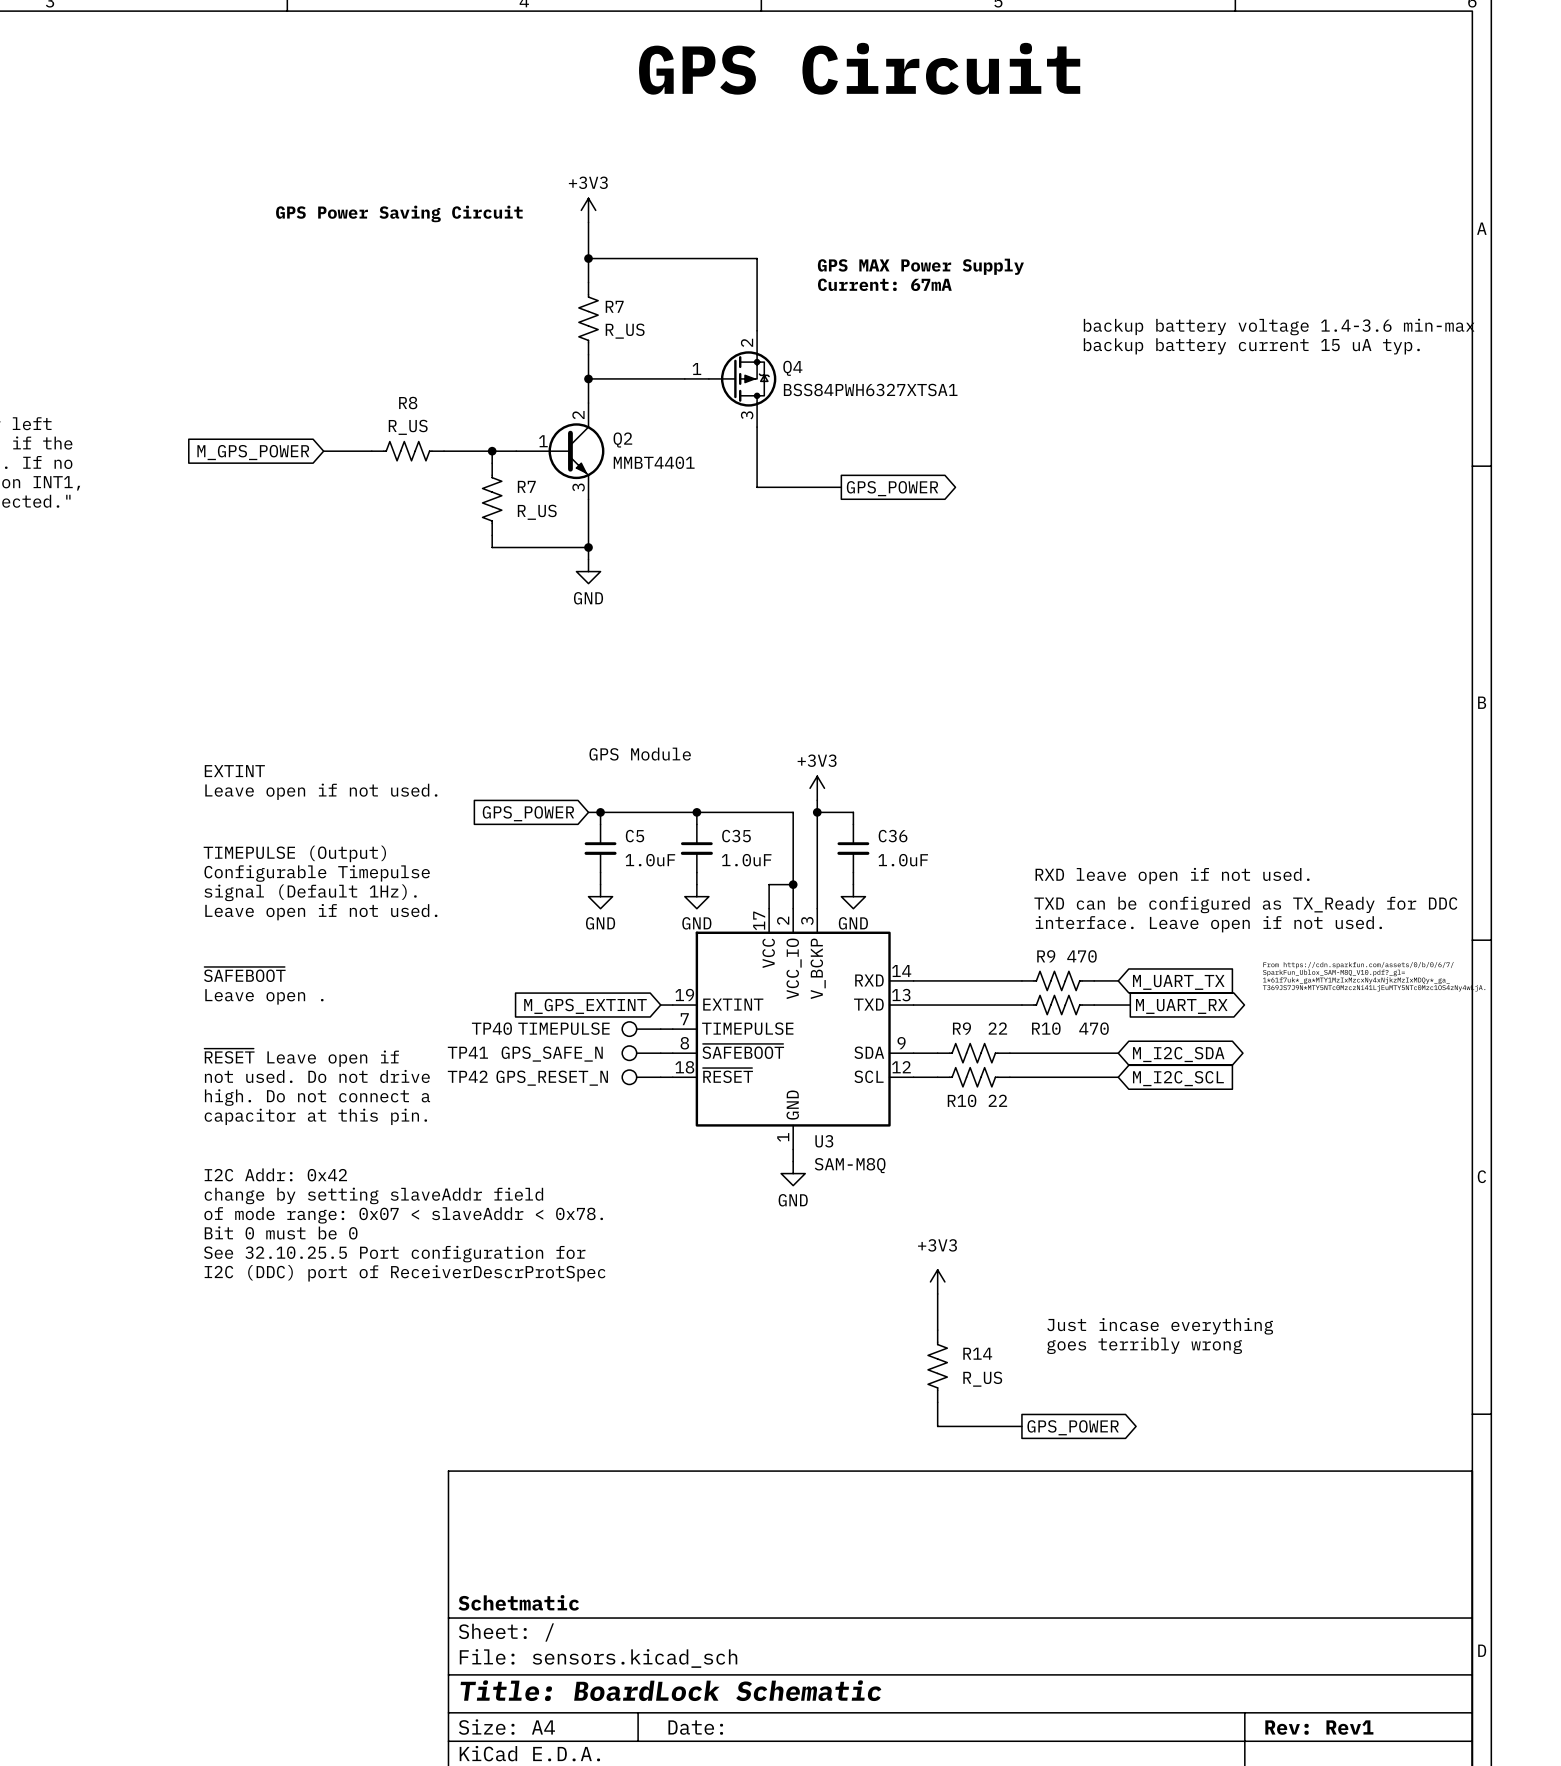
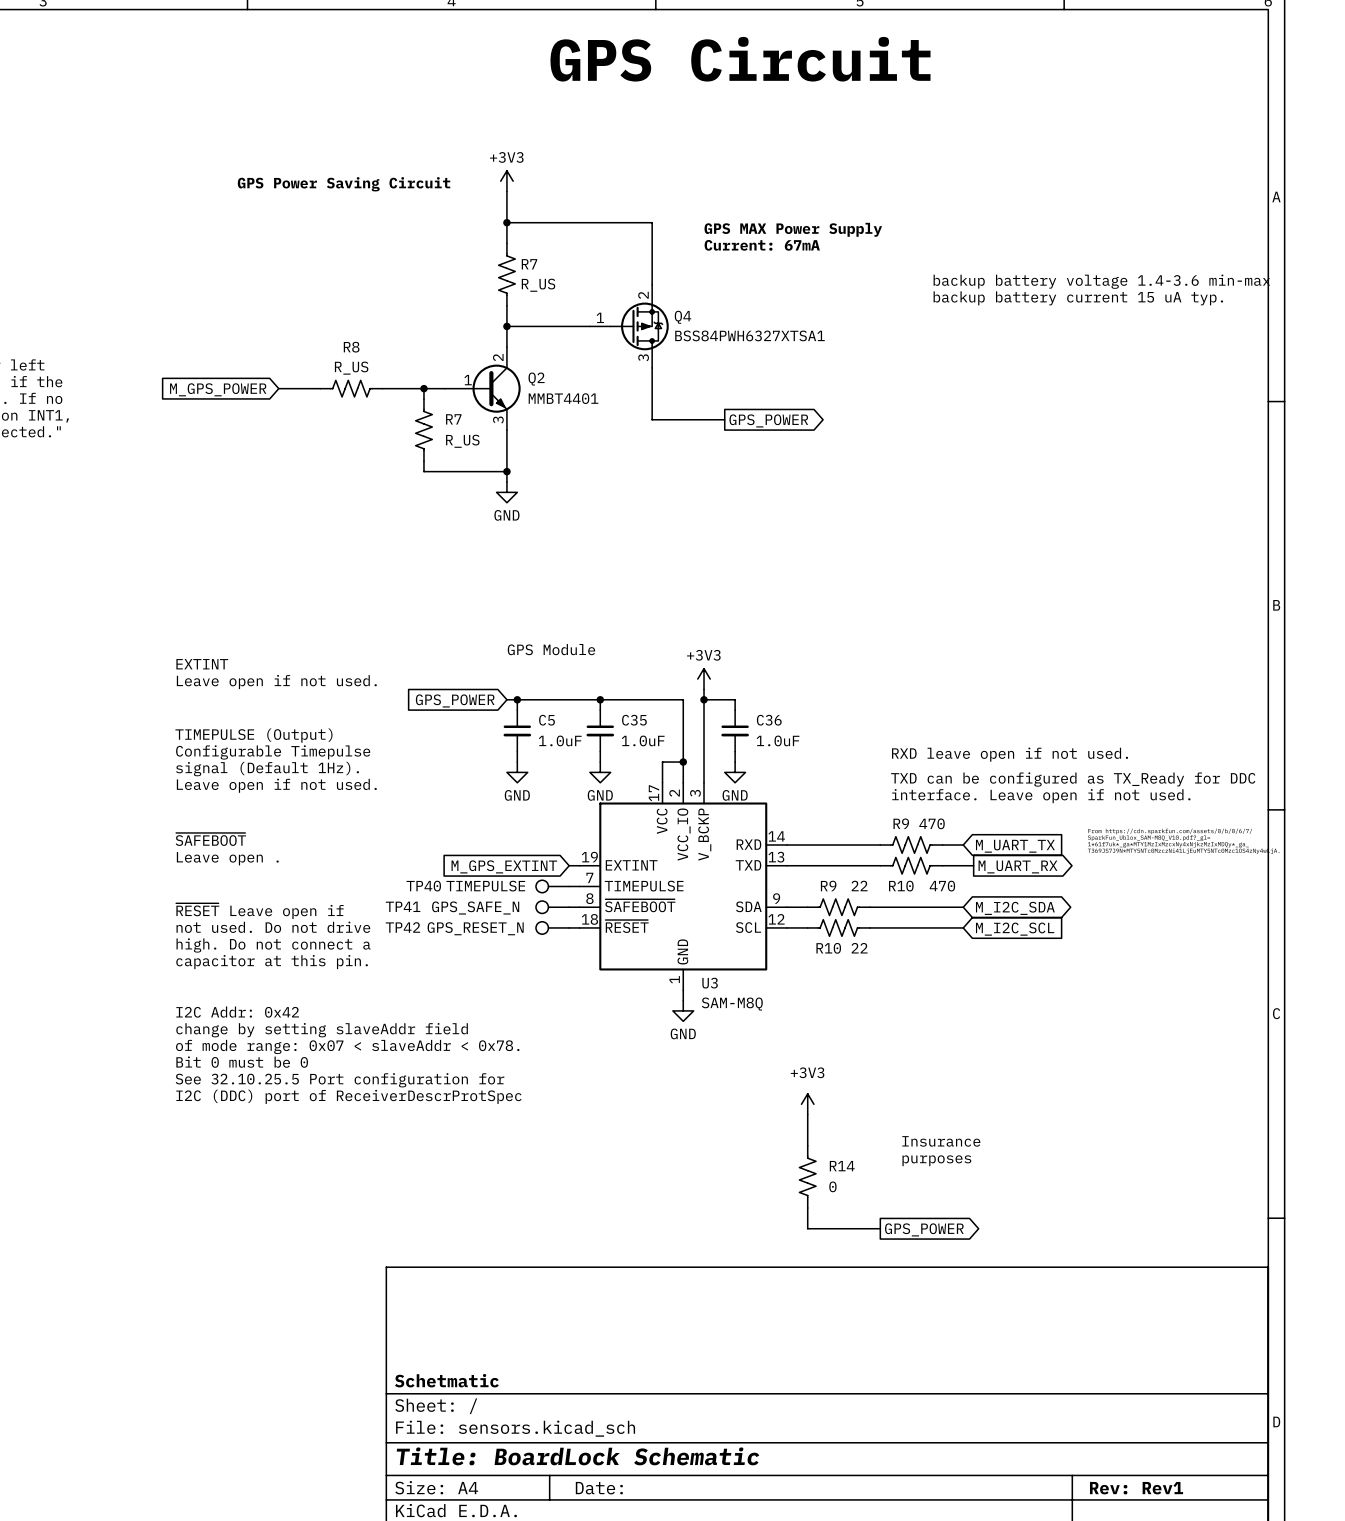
text: Just incase everything (1160, 1326) -> Insurance (941, 1141)
text: goes terribly wrong (1144, 1345) -> purposes (936, 1160)
R14 value: R_US (982, 1379) -> 0 (832, 1186)

